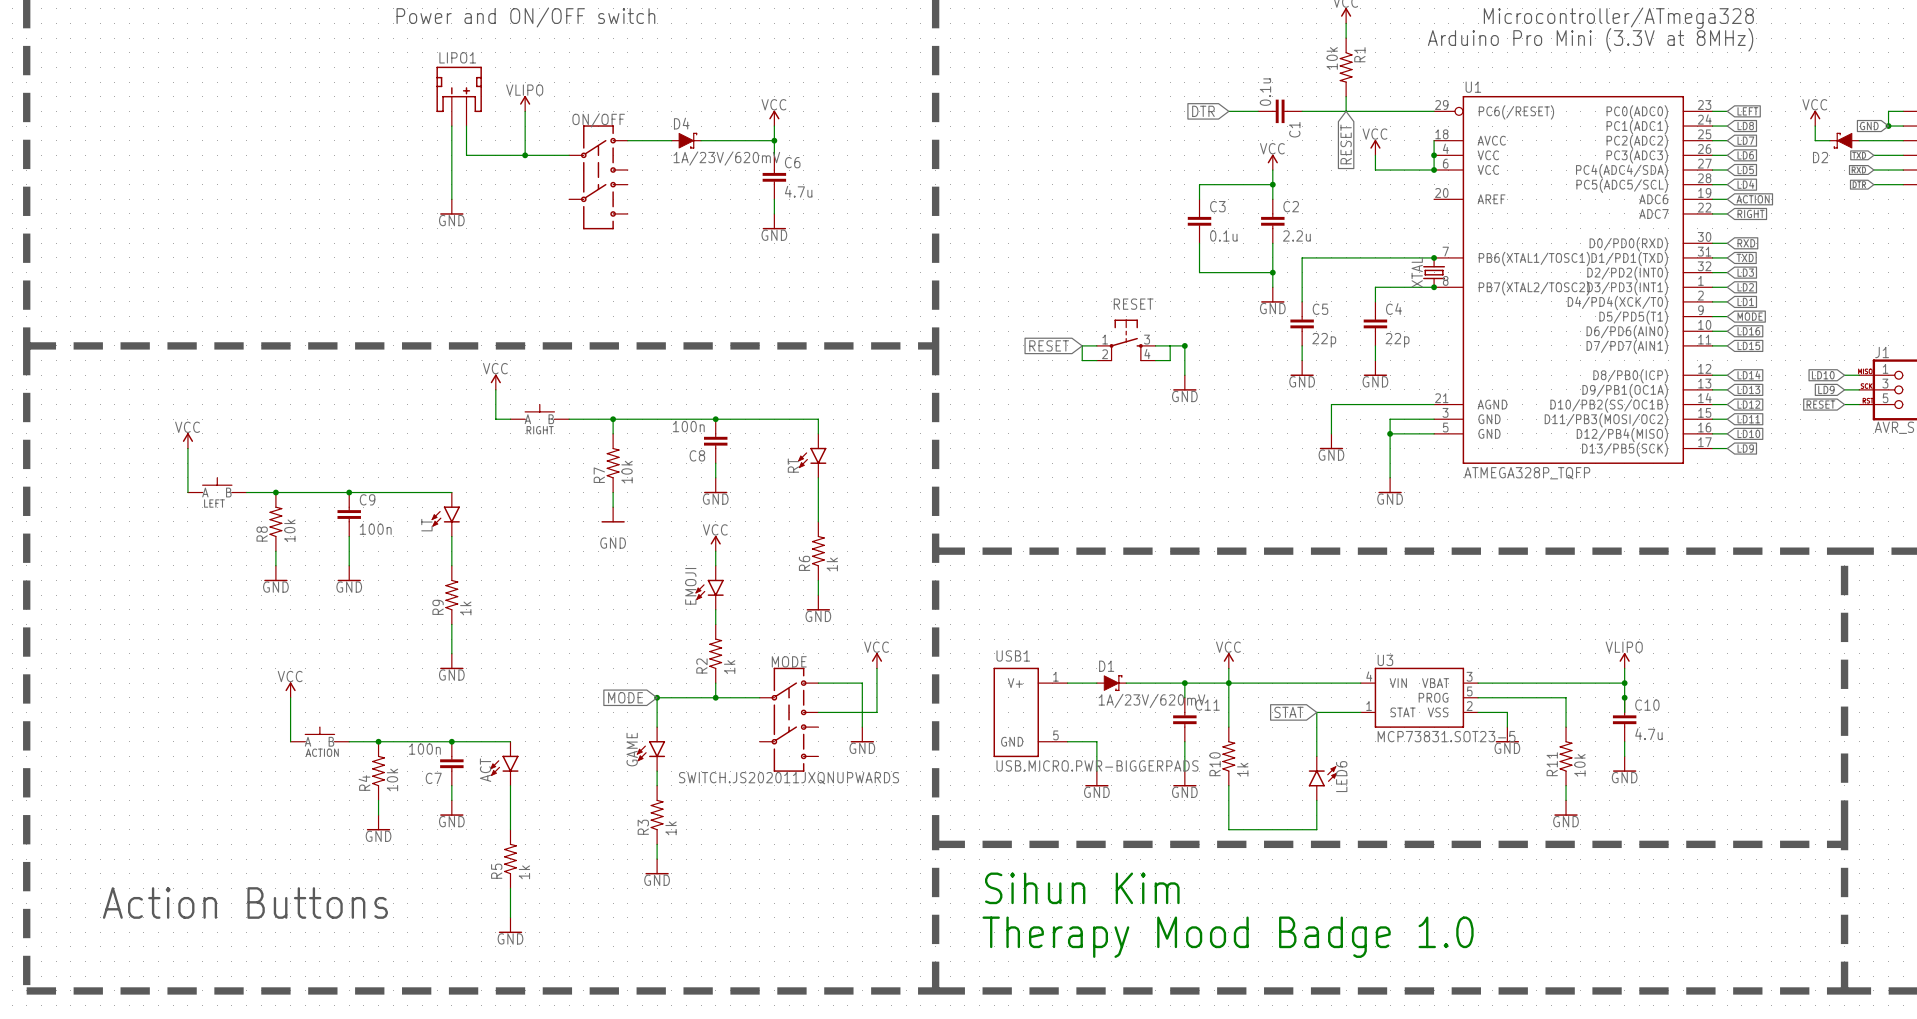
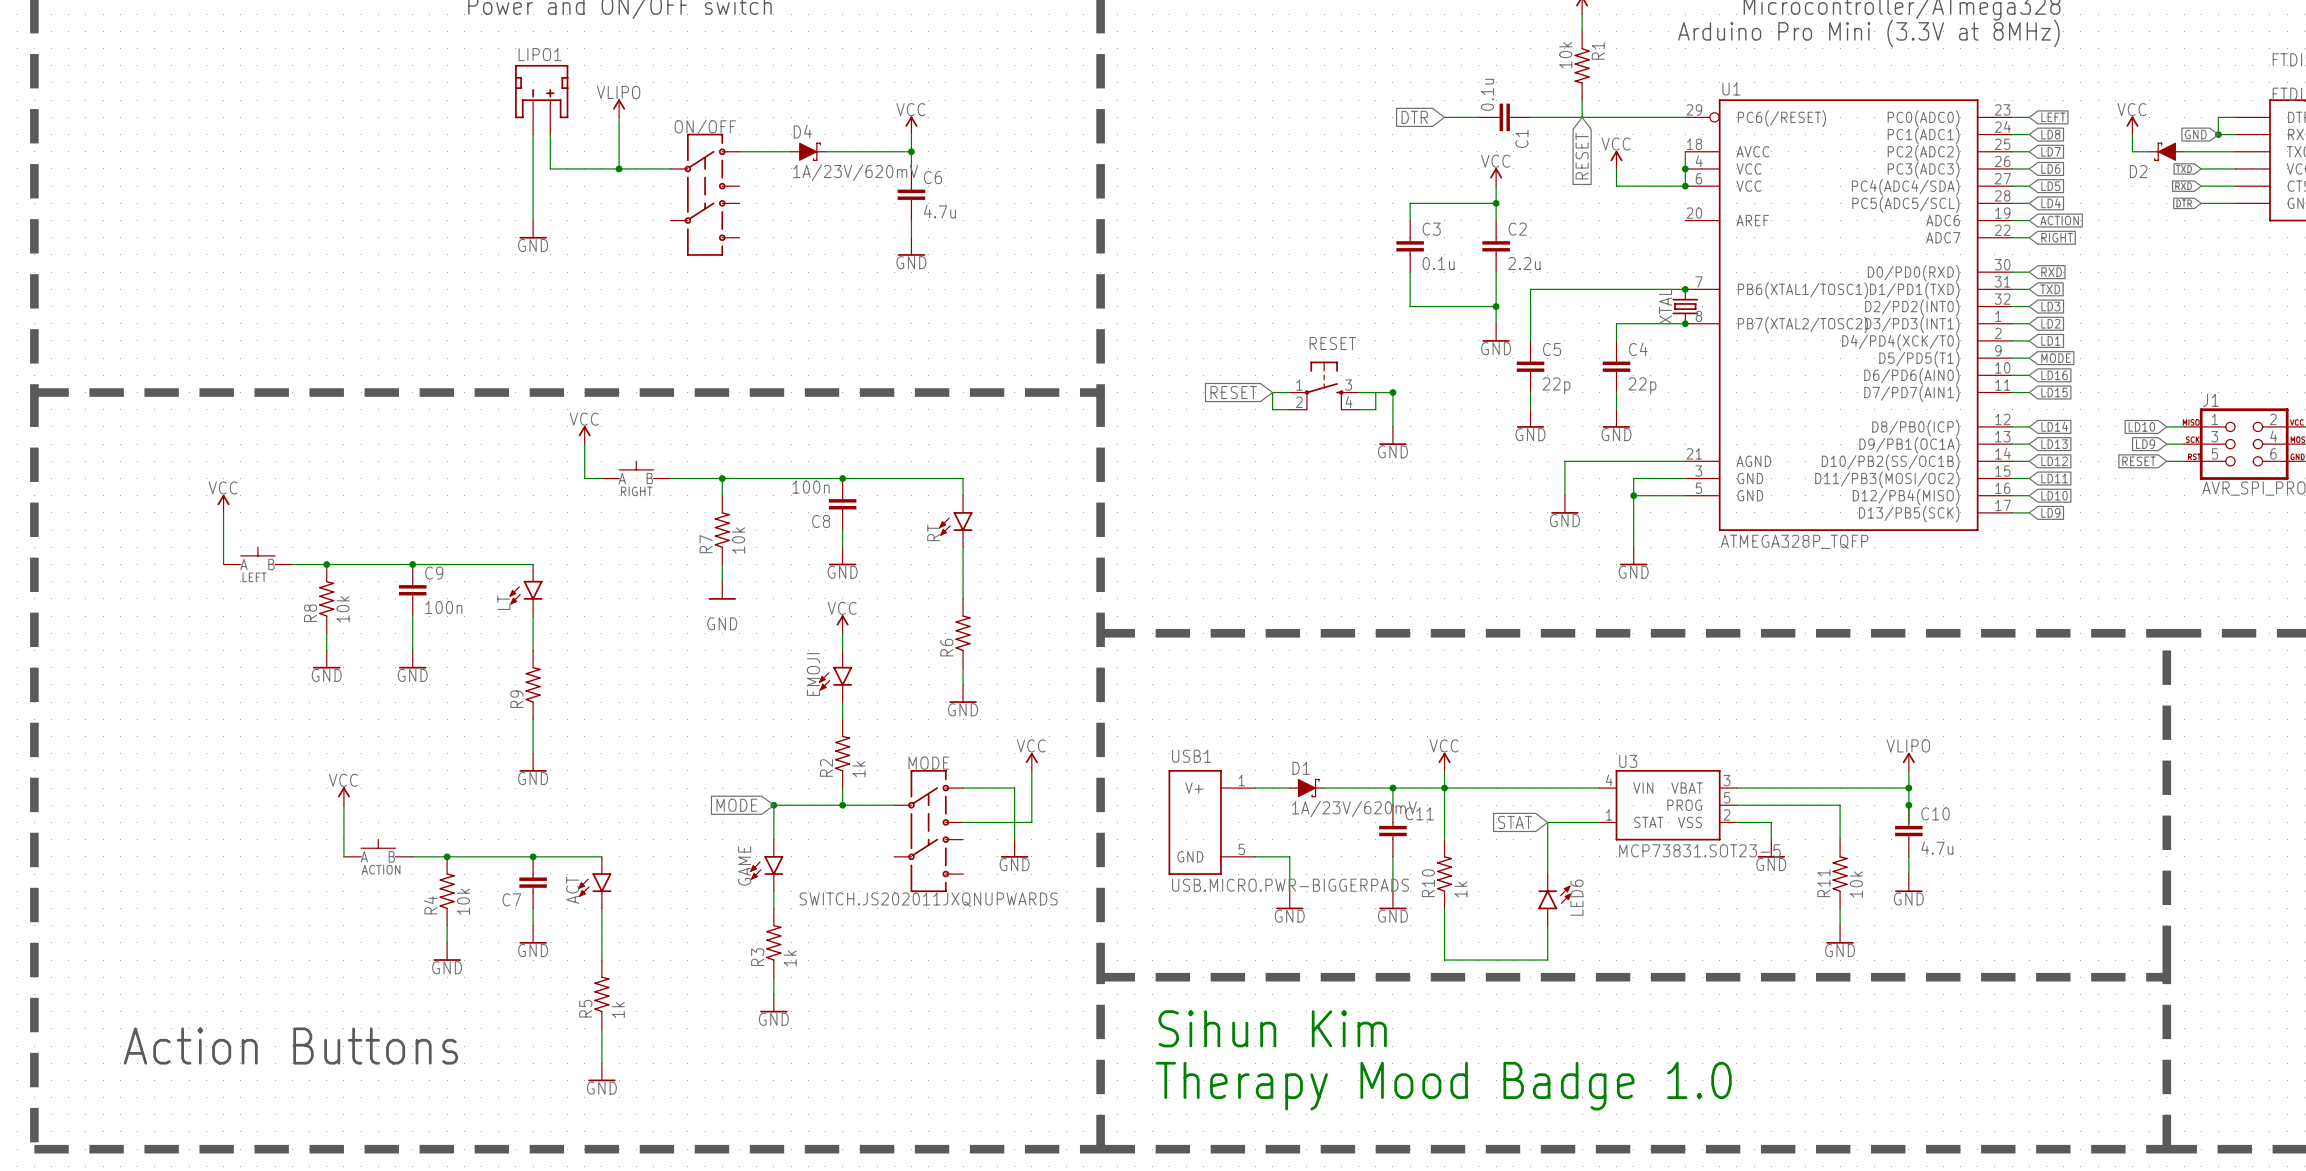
R6 value: 1k (832, 564) -> none
R9 value: 1k (465, 608) -> none
C7 value: 100n (424, 749) -> none

